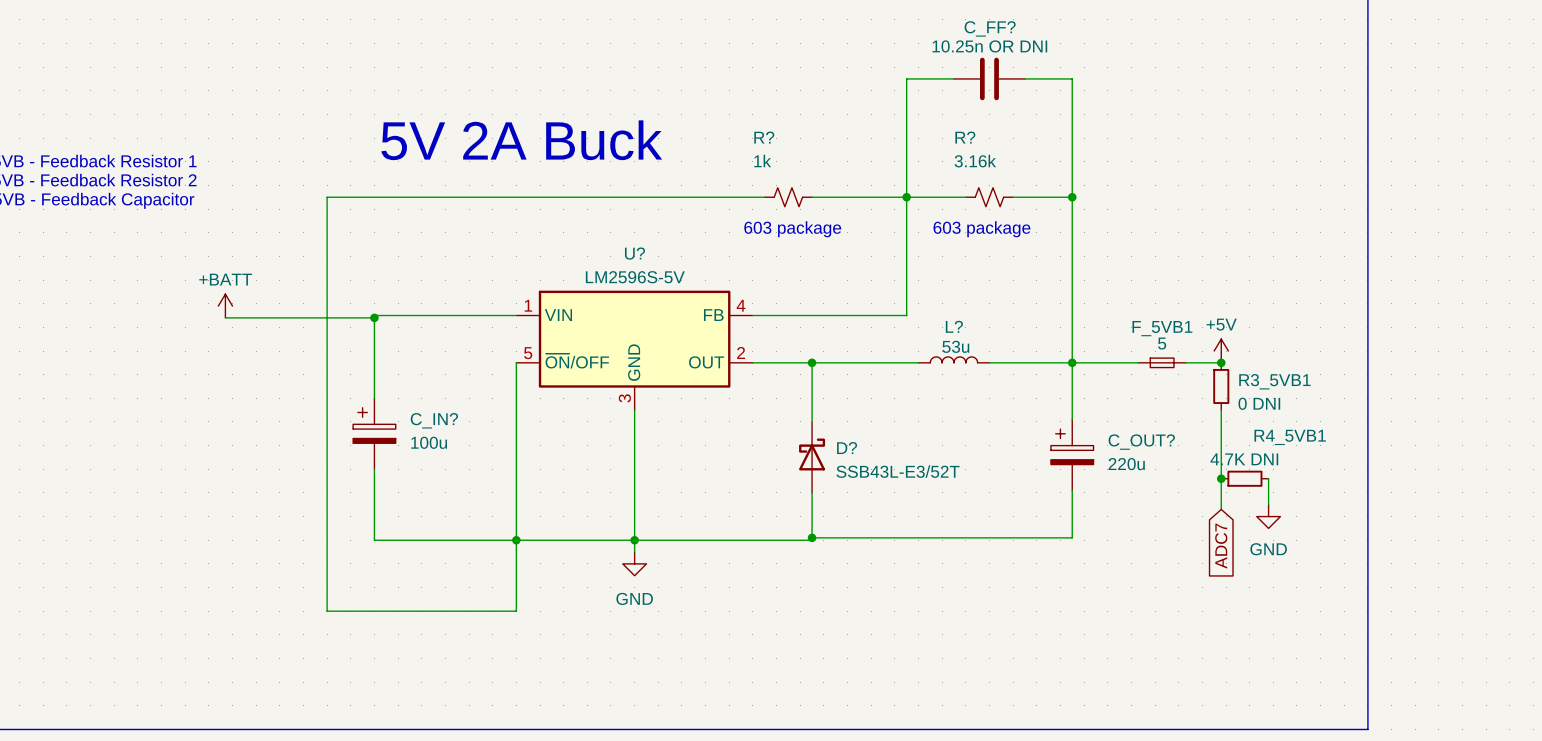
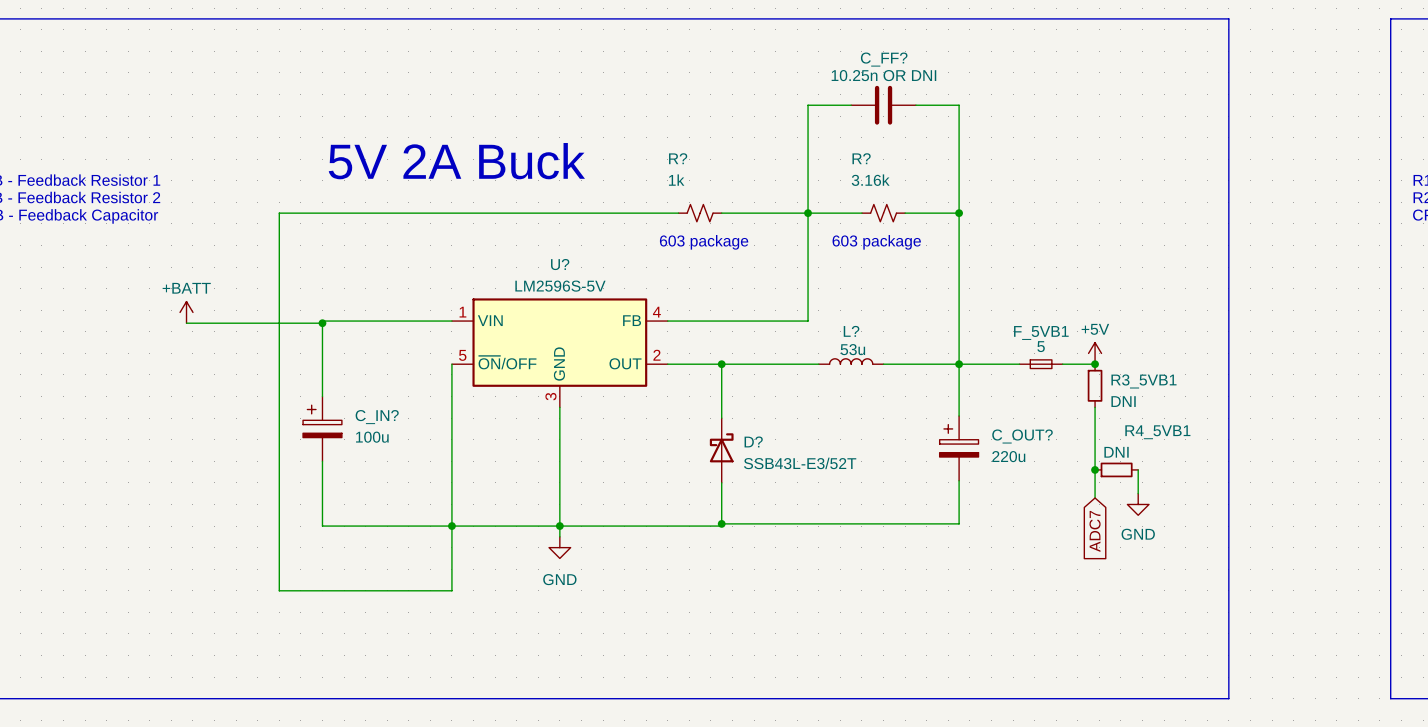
R3_5VB1 value: 0 DNI (1259, 403) -> DNI (1123, 401)
R4_5VB1 value: 4.7K DNI (1244, 459) -> DNI (1116, 452)

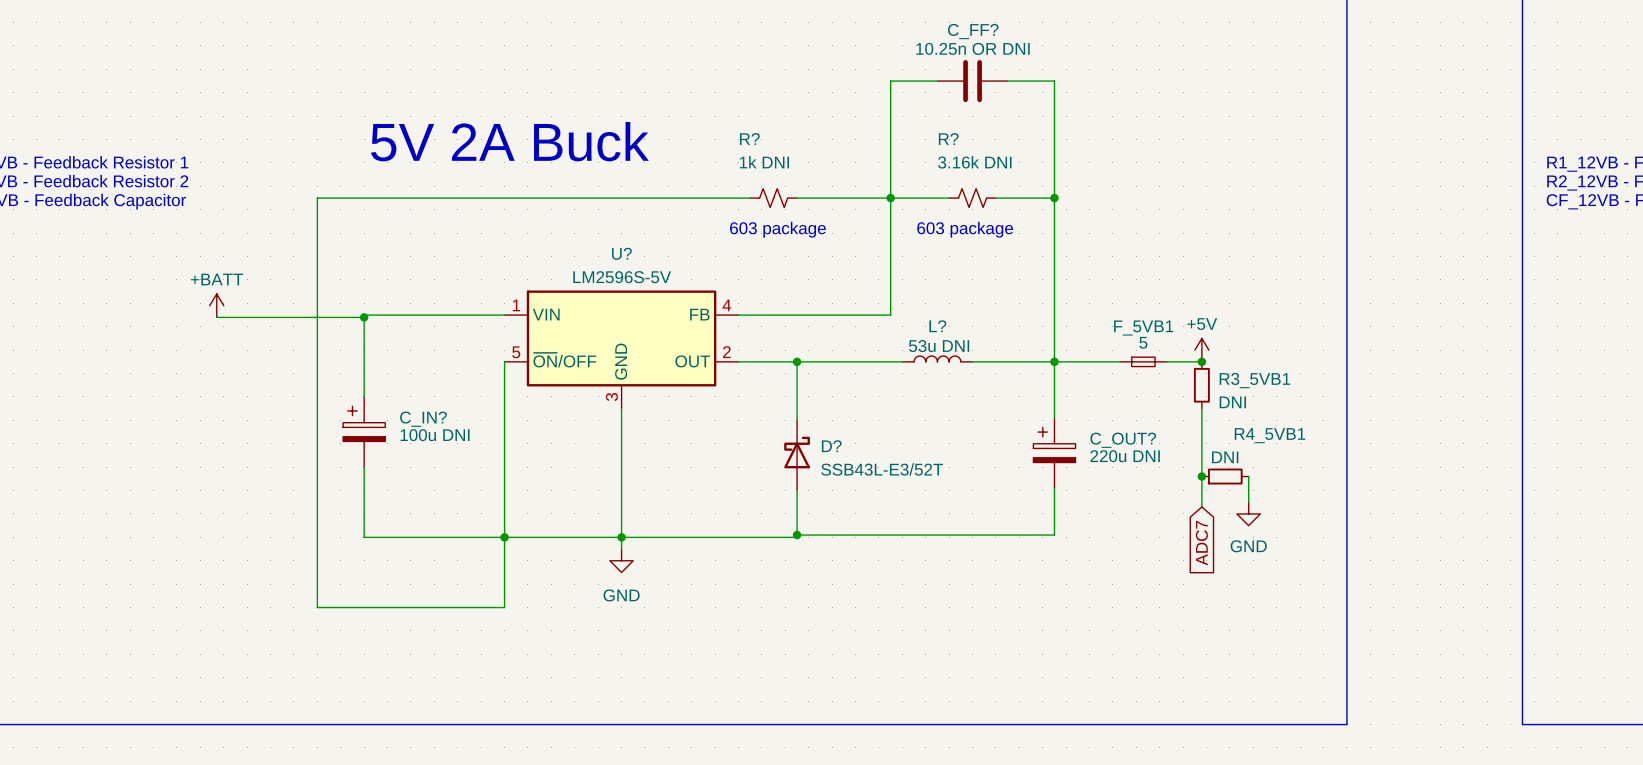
R? value: 1k (676, 180) -> 1k DNI (764, 162)
R? value: 3.16k (870, 180) -> 3.16k DNI (974, 162)
L? value: 53u (852, 349) -> 53u DNI (939, 346)
C_IN? value: 100u (372, 437) -> 100u DNI (435, 435)
C_OUT? value: 220u (1008, 456) -> 220u DNI (1125, 456)

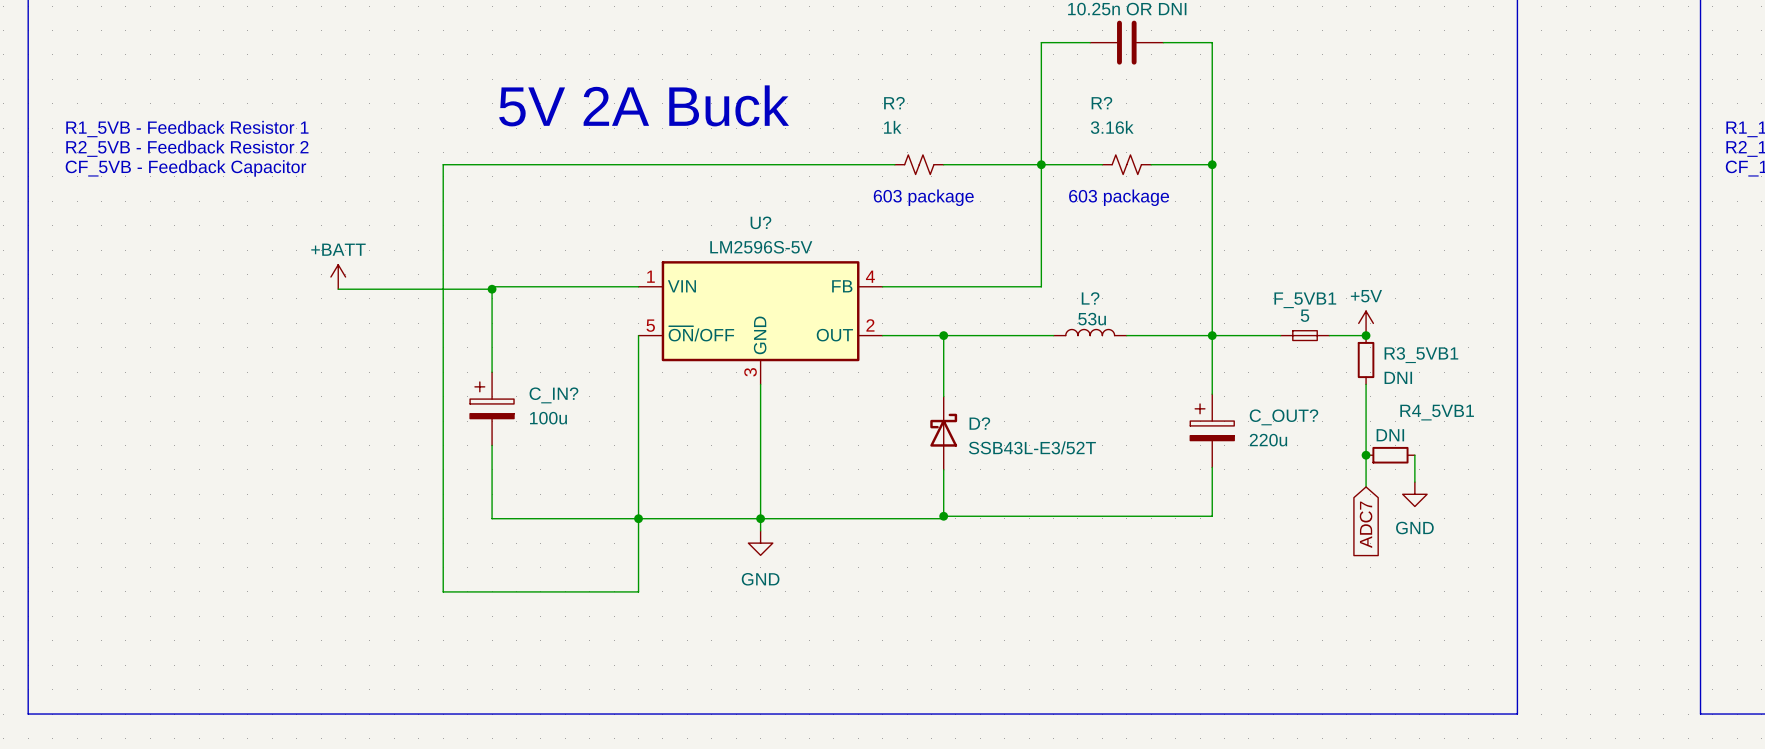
R? value: 1k DNI (764, 162) -> 1k (892, 127)
R? value: 3.16k DNI (974, 162) -> 3.16k (1112, 127)
L? value: 53u DNI (939, 346) -> 53u (1092, 319)
C_IN? value: 100u DNI (435, 435) -> 100u (548, 418)
C_OUT? value: 220u DNI (1125, 456) -> 220u (1268, 440)

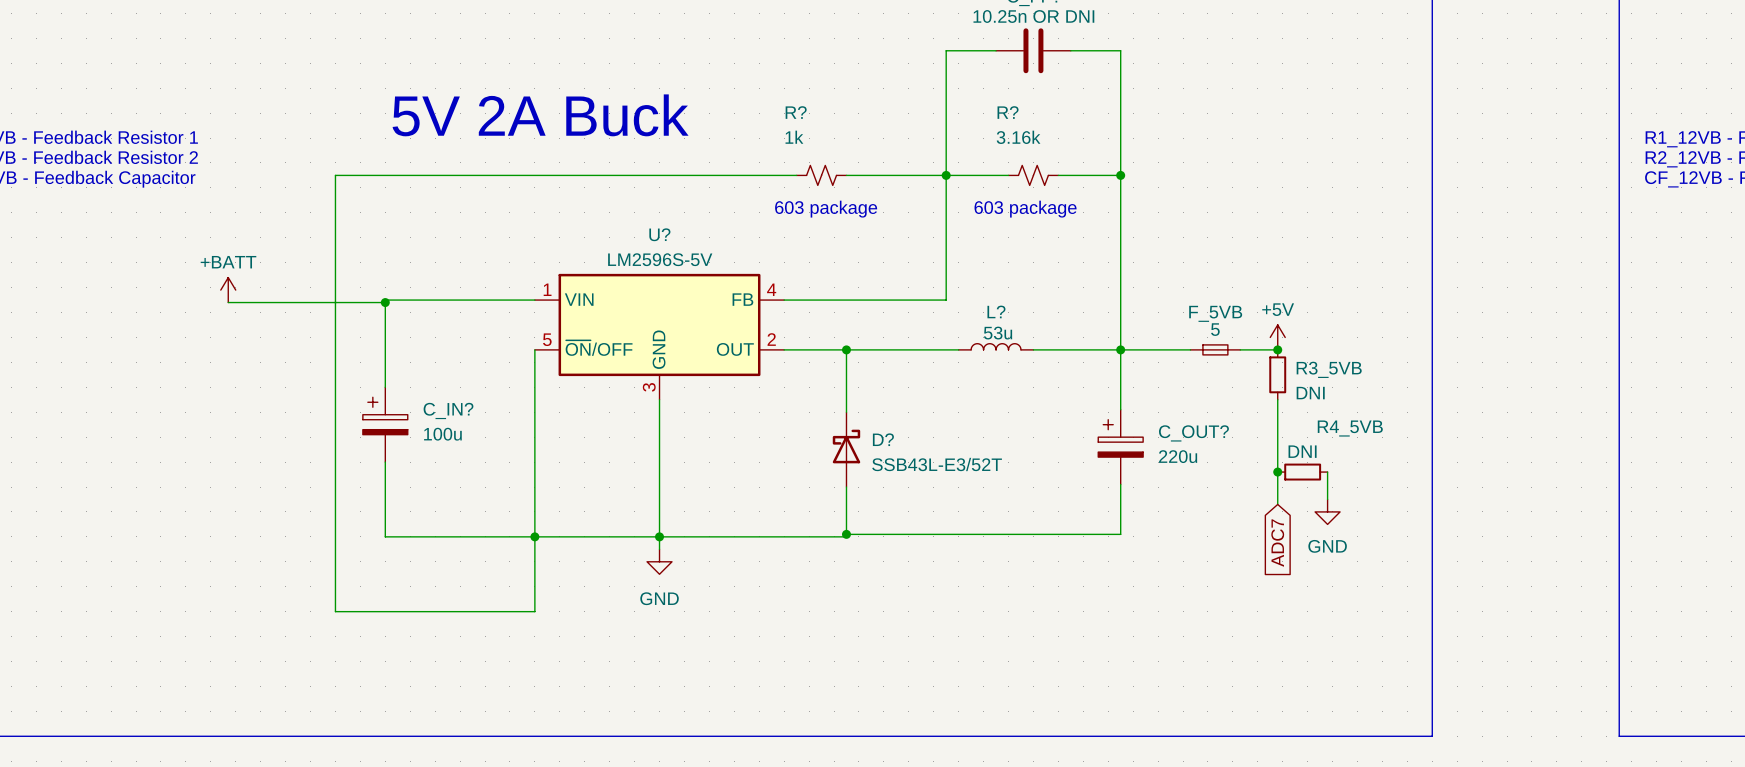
F_5VB1 name: F_5VB1 (1305, 300) -> F_5VB (1215, 313)
R3_5VB1 name: R3_5VB1 (1421, 355) -> R3_5VB (1329, 369)
R4_5VB1 name: R4_5VB1 (1437, 412) -> R4_5VB (1350, 428)

